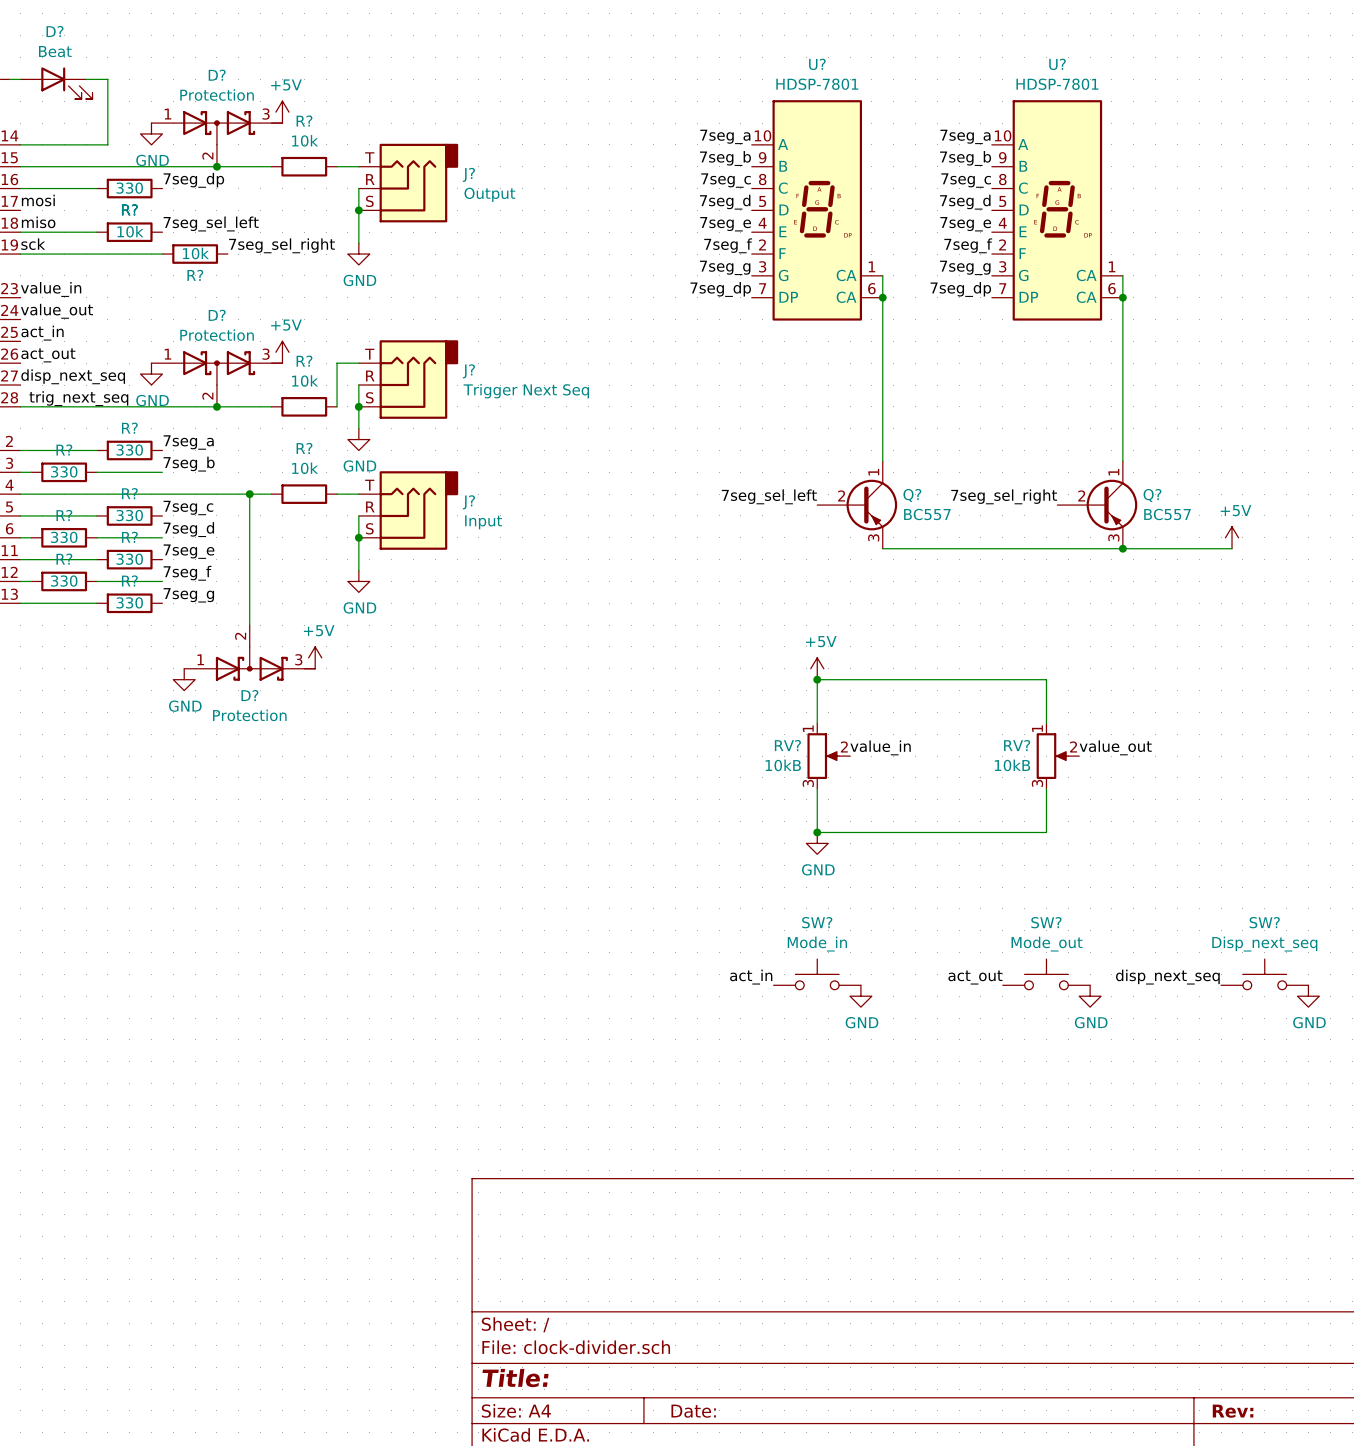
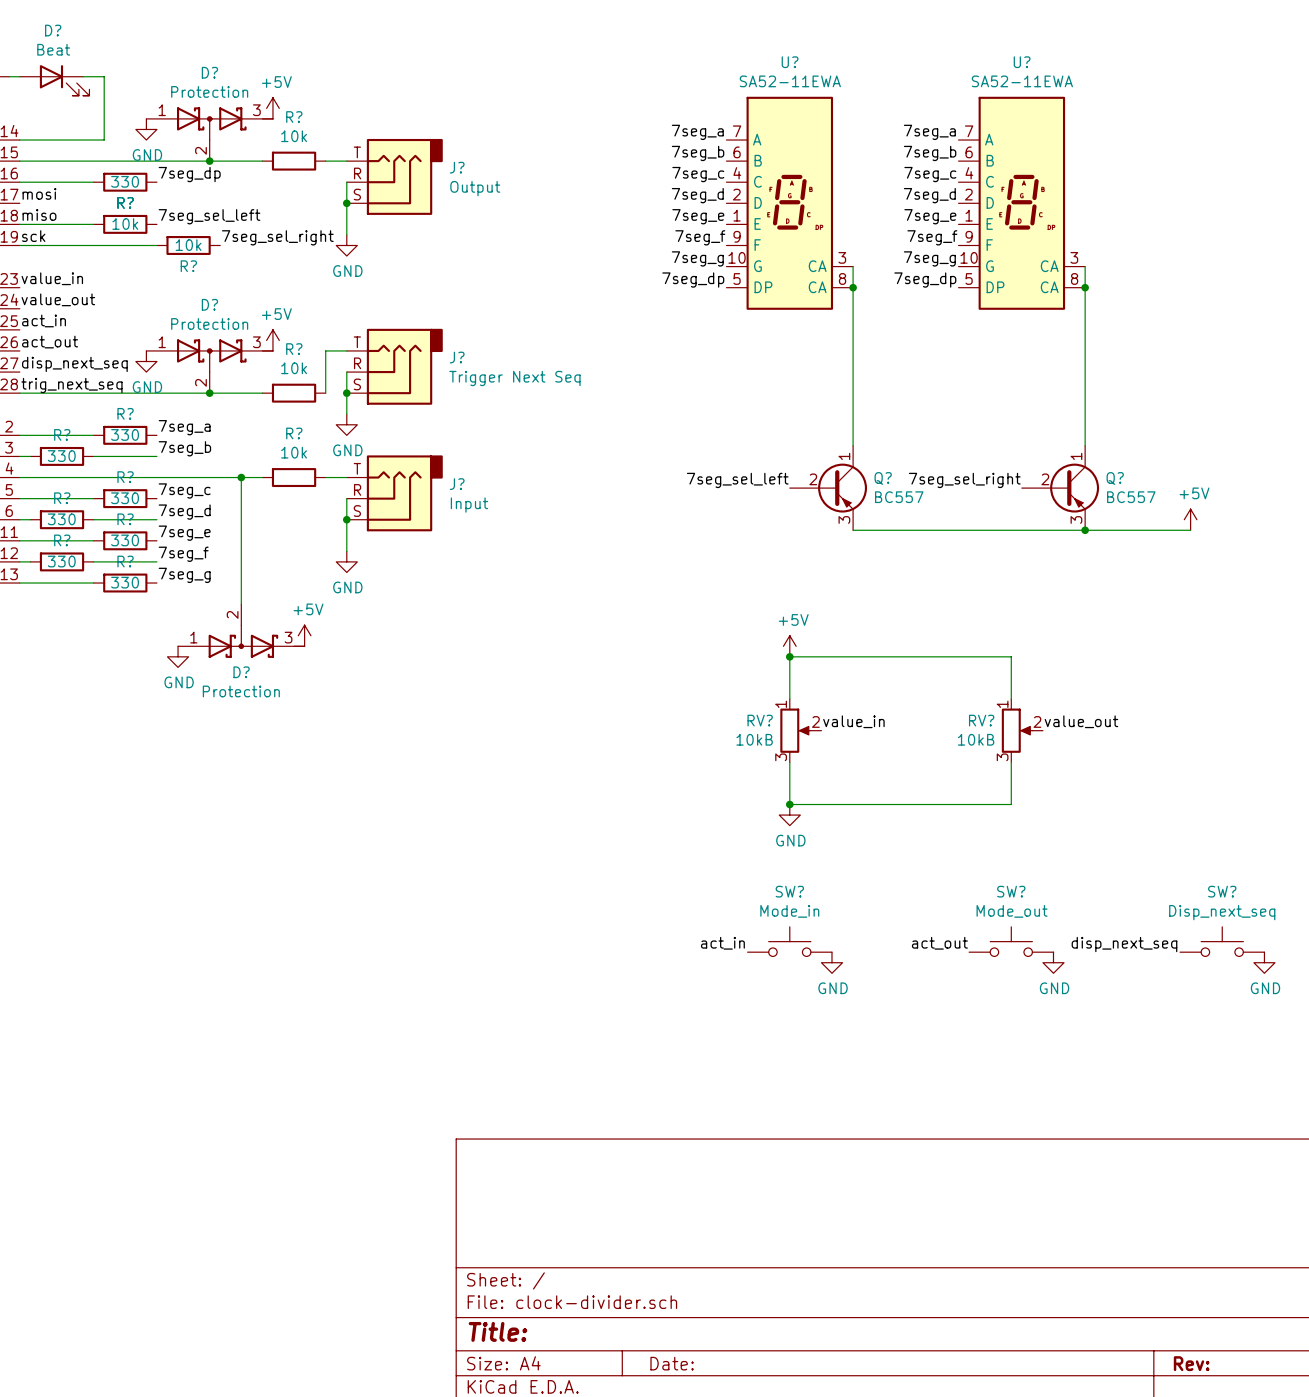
U? value: HDSP-7801 (817, 84) -> SA52-11EWA (790, 81)
U? value: HDSP-7801 (1057, 84) -> SA52-11EWA (1022, 81)
U? symbol: [751, 100, 883, 321] -> [726, 96, 854, 310]
U? symbol: [991, 100, 1123, 321] -> [958, 96, 1086, 310]

